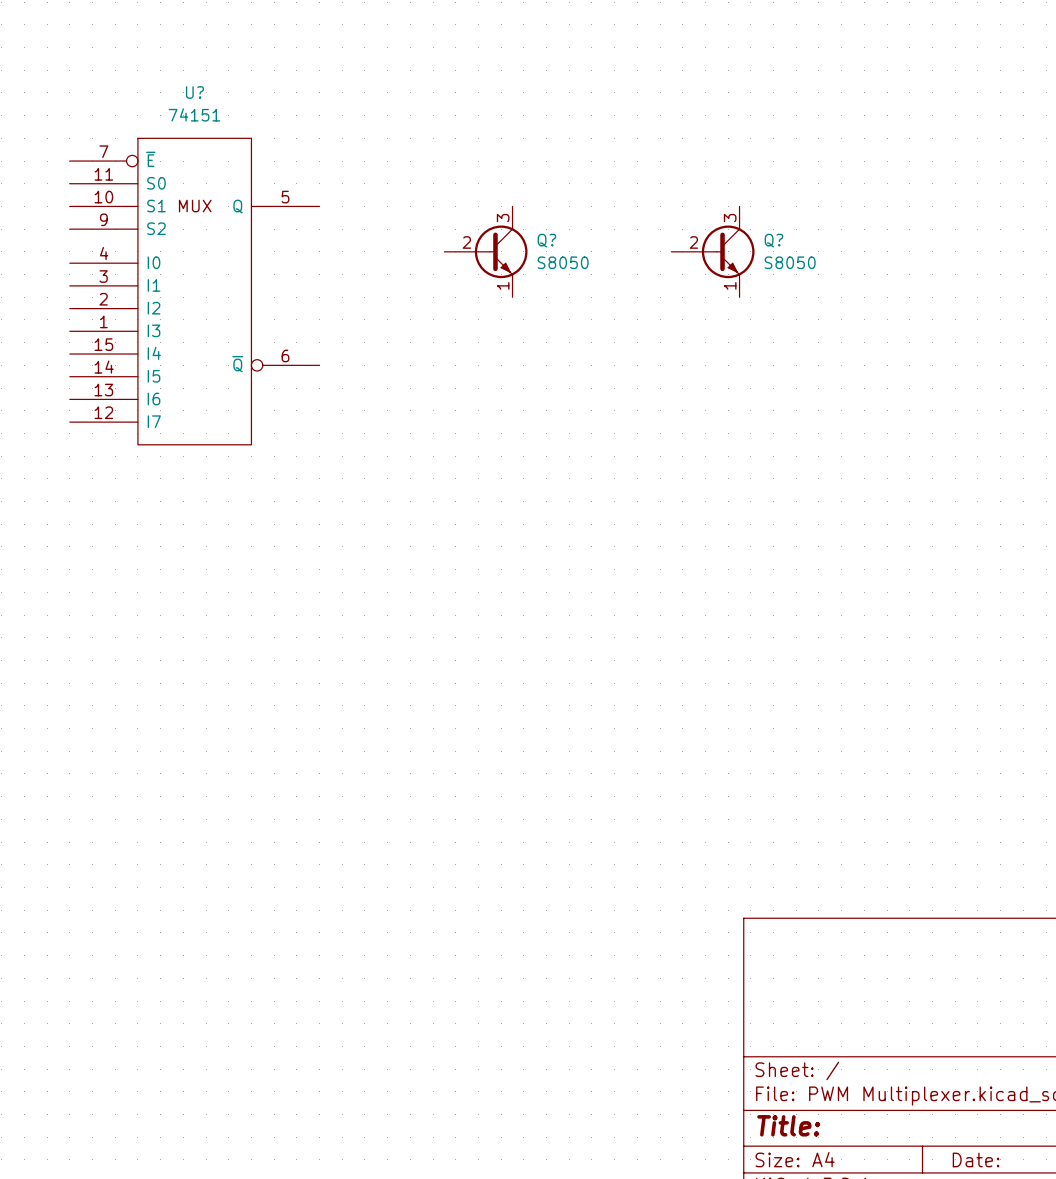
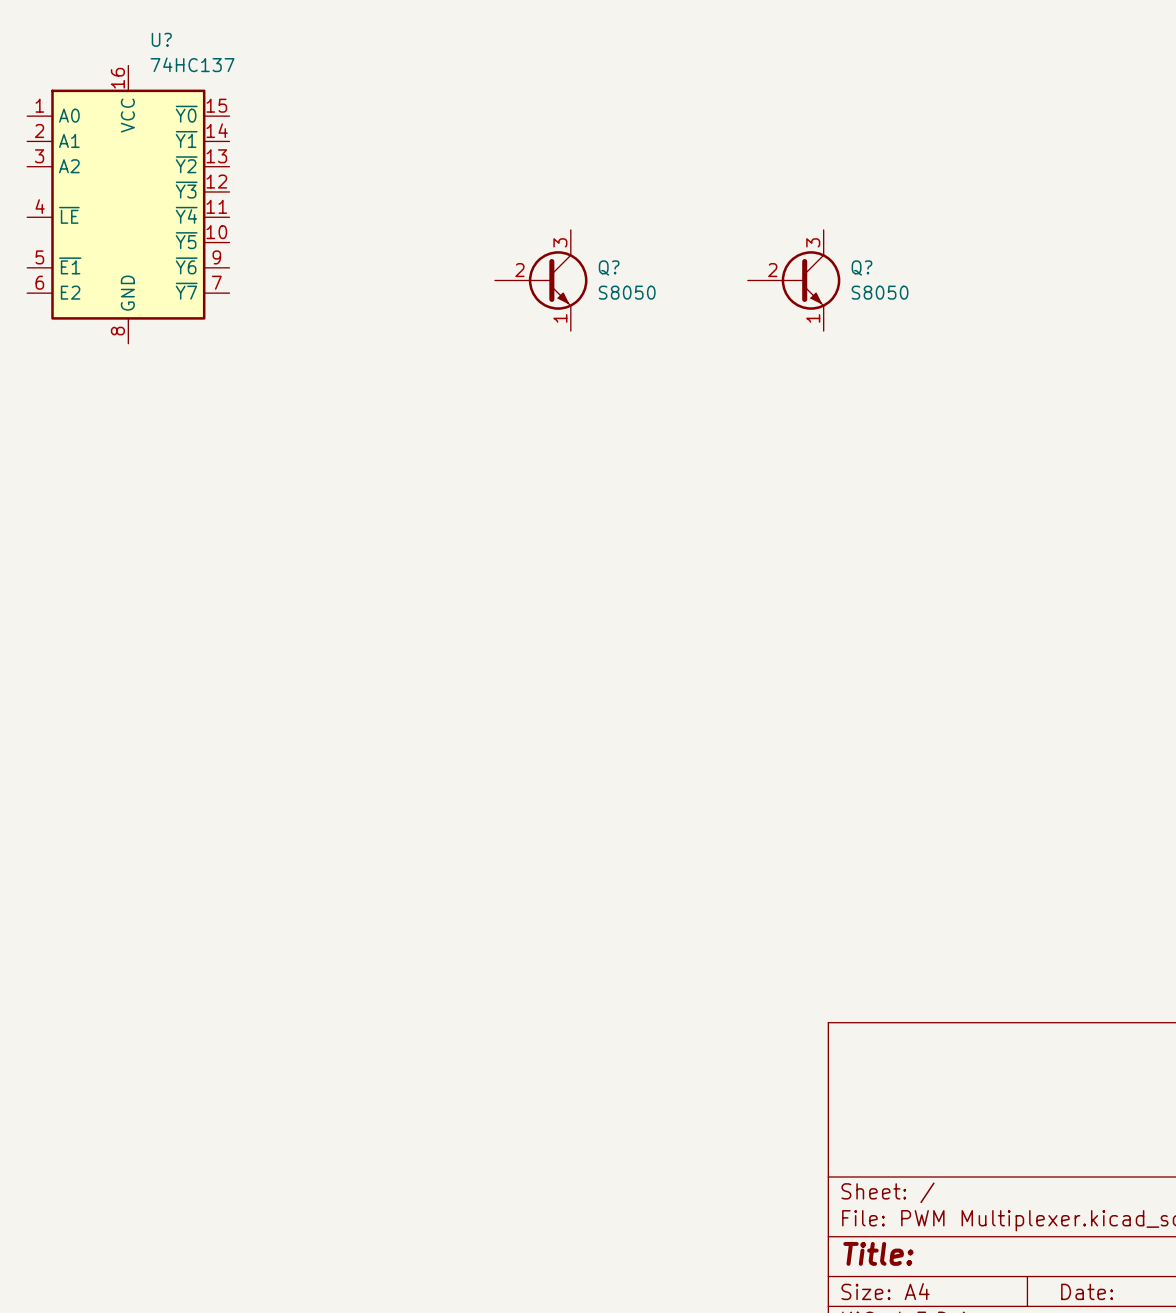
U?: none -> 74HC137 (128, 204)
U?: 74151 (194, 291) -> none

